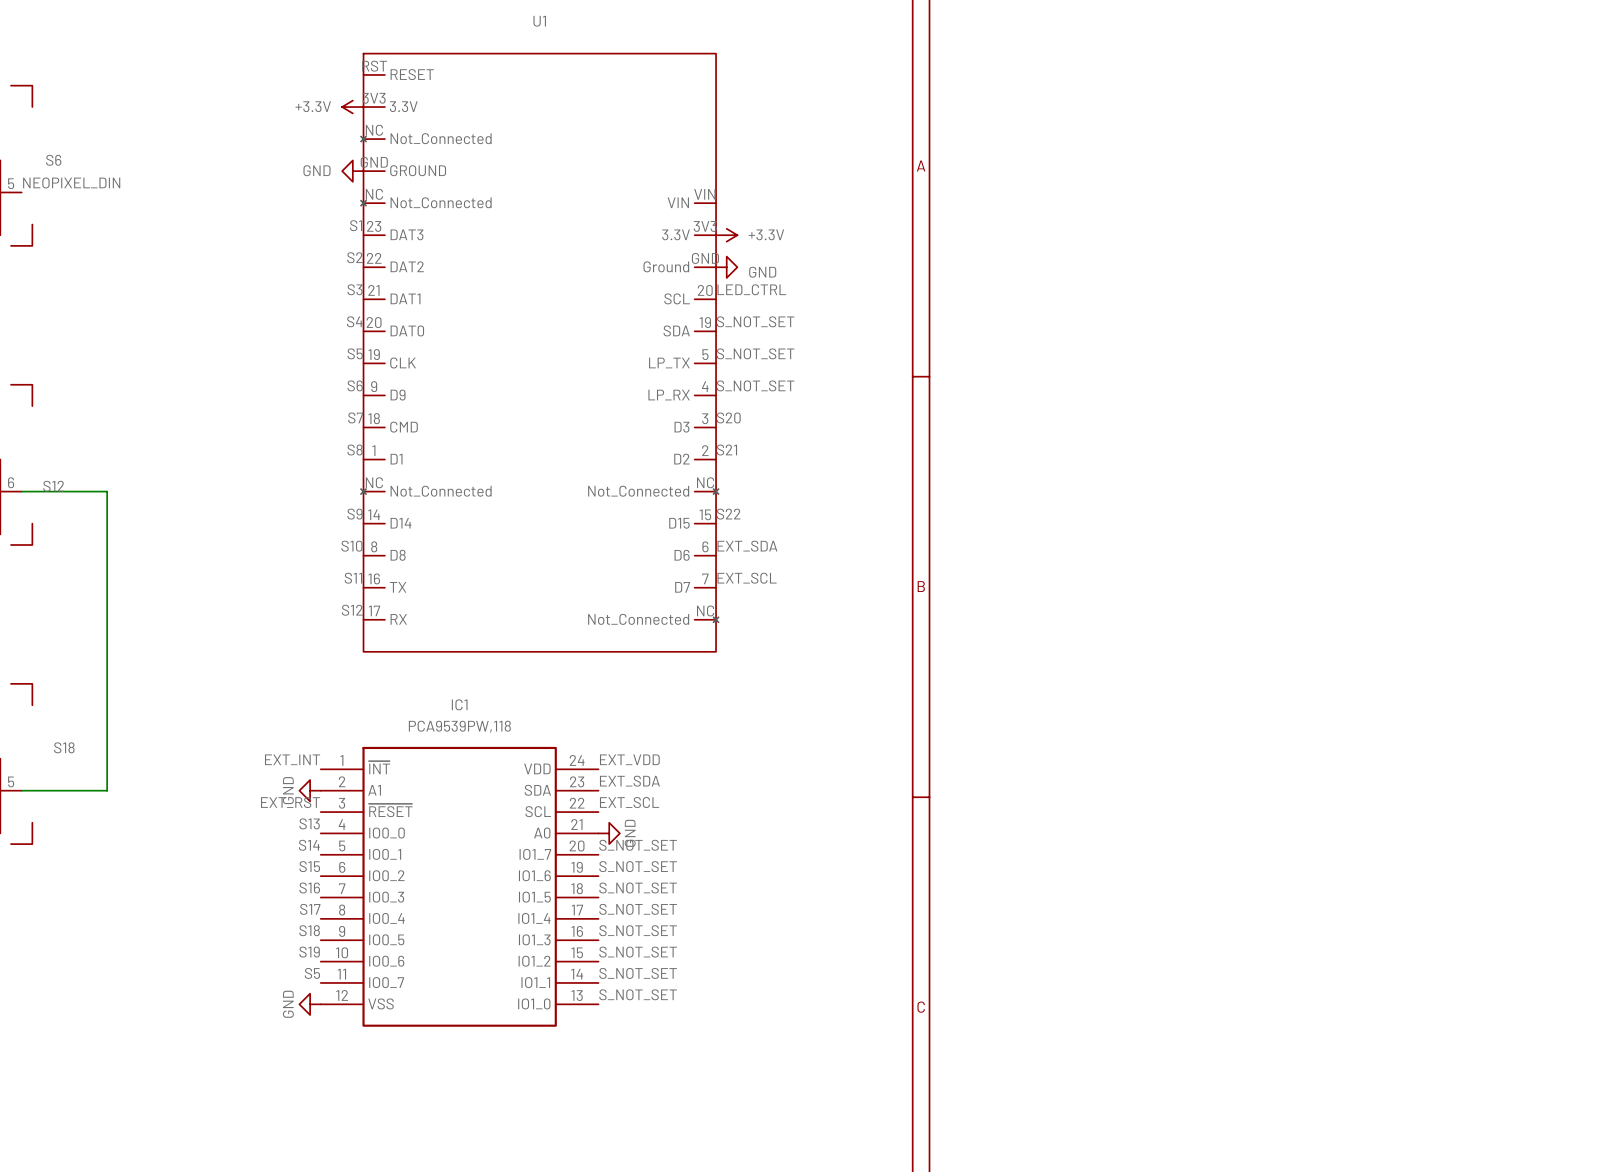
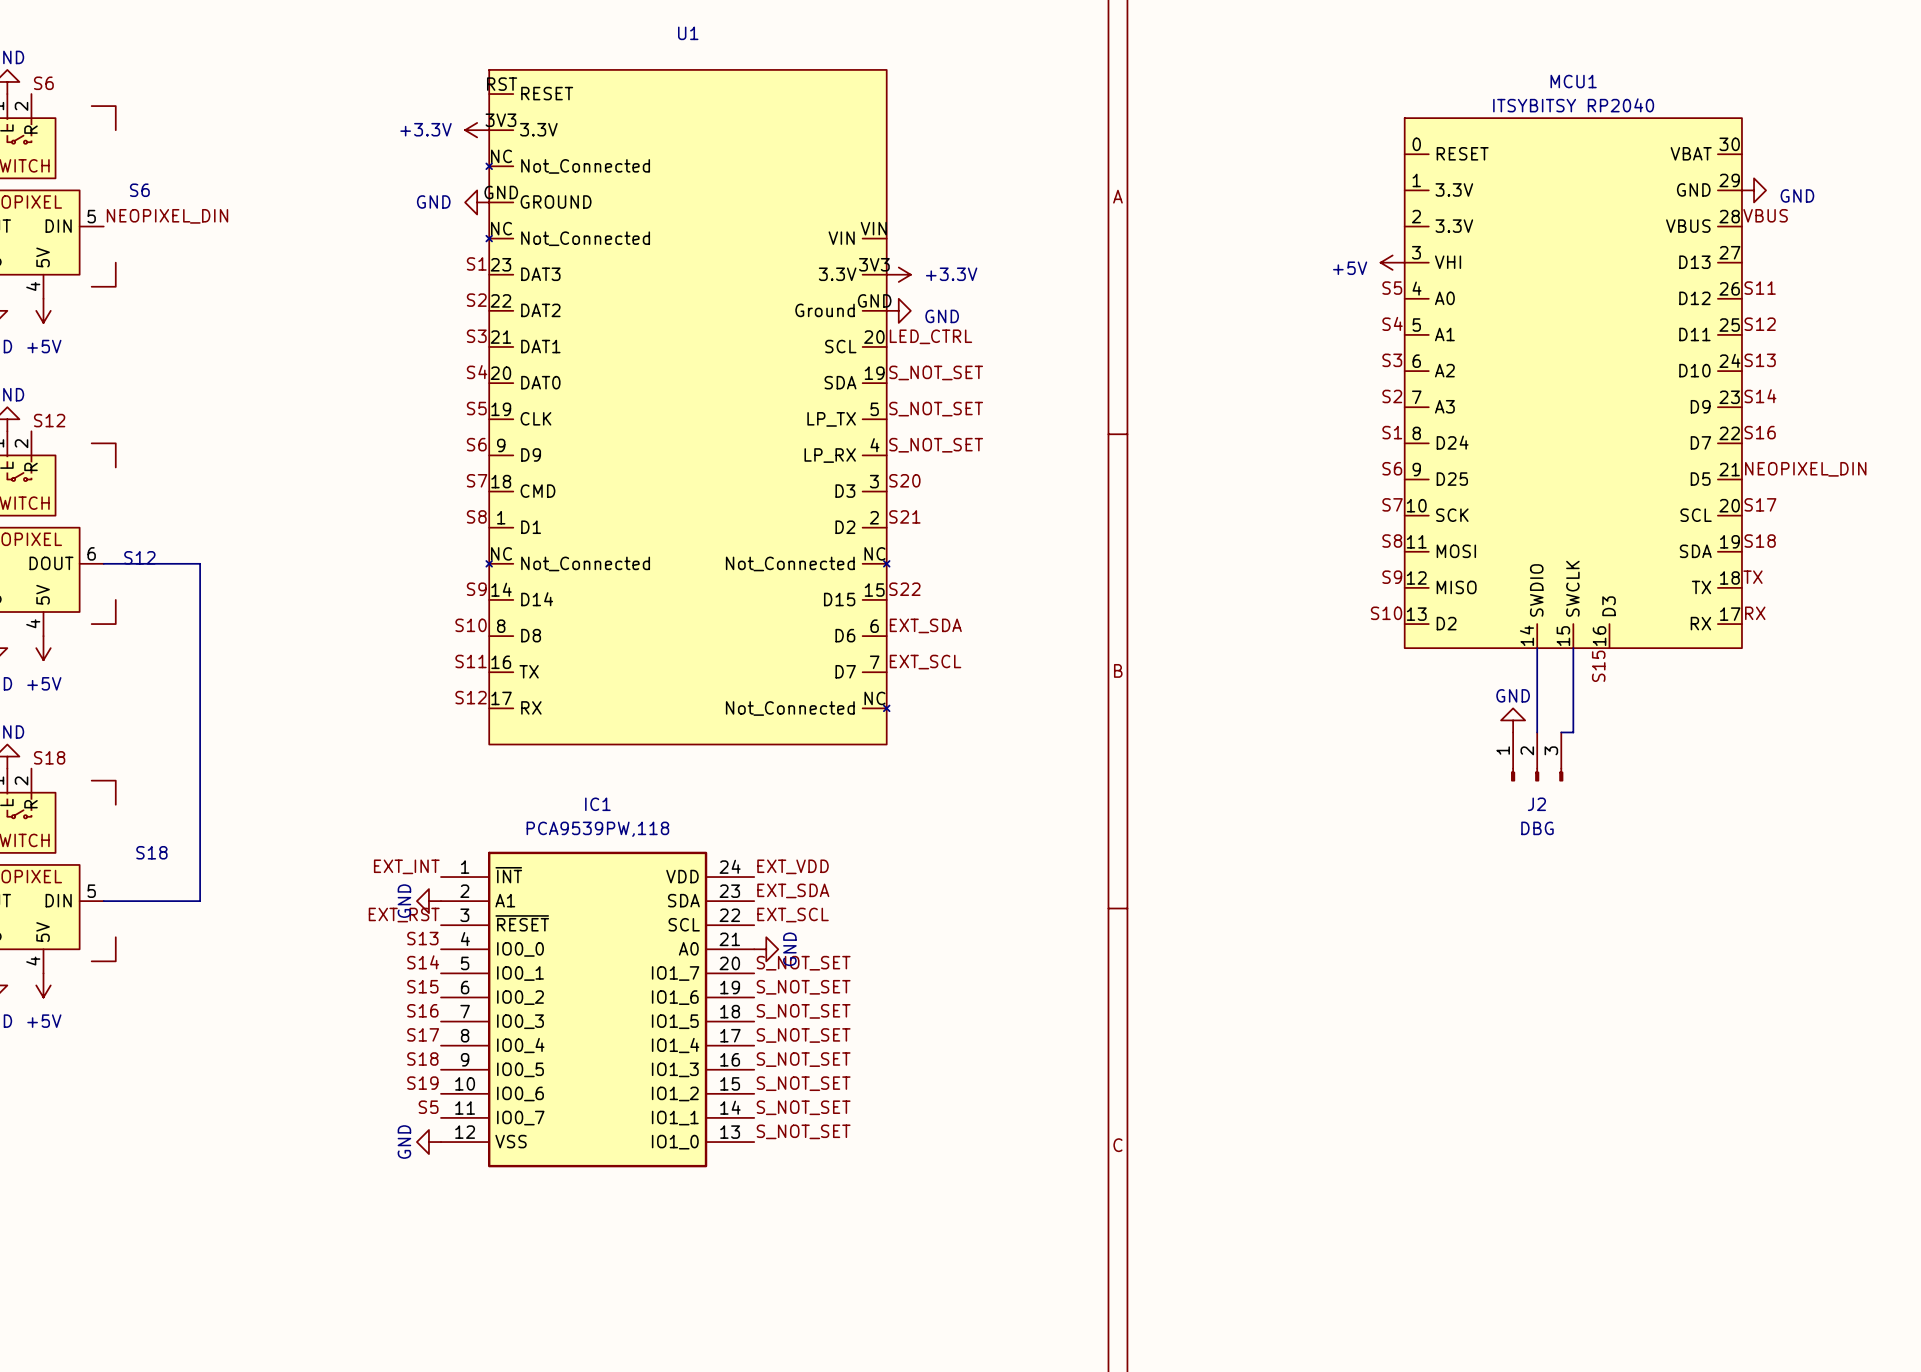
power symbol: none -> GND (1754, 190)
label: none -> VBUS (1765, 215)
power symbol: none -> +5V (1392, 262)
label: none -> S5 (1392, 288)
label: none -> S11 (1760, 288)
label: none -> S4 (1392, 323)
label: none -> S12 (1760, 324)
label: none -> S3 (1392, 360)
label: none -> S13 (1760, 360)
MCU1: none -> ITSYBITSY RP2040 (1573, 383)
label: none -> S2 (1392, 396)
label: none -> S14 (1760, 396)
label: none -> S1 (1392, 432)
label: none -> S16 (1760, 432)
label: none -> S6 (1392, 468)
label: none -> NEOPIXEL_DIN (1805, 469)
label: none -> S7 (1392, 504)
label: none -> S17 (1760, 504)
label: none -> S8 (1392, 541)
label: none -> S18 (1760, 541)
label: none -> S9 (1392, 577)
label: none -> TX (1752, 577)
label: none -> S10 (1386, 613)
label: none -> RX (1755, 613)
wire: none -> (1537, 648) (1537, 732)
wire: none -> (1573, 648) (1573, 732) (1561, 732)
label: none -> S15 (1598, 666)
power symbol: none -> GND (1513, 720)
J2: none -> DBG (1537, 756)

